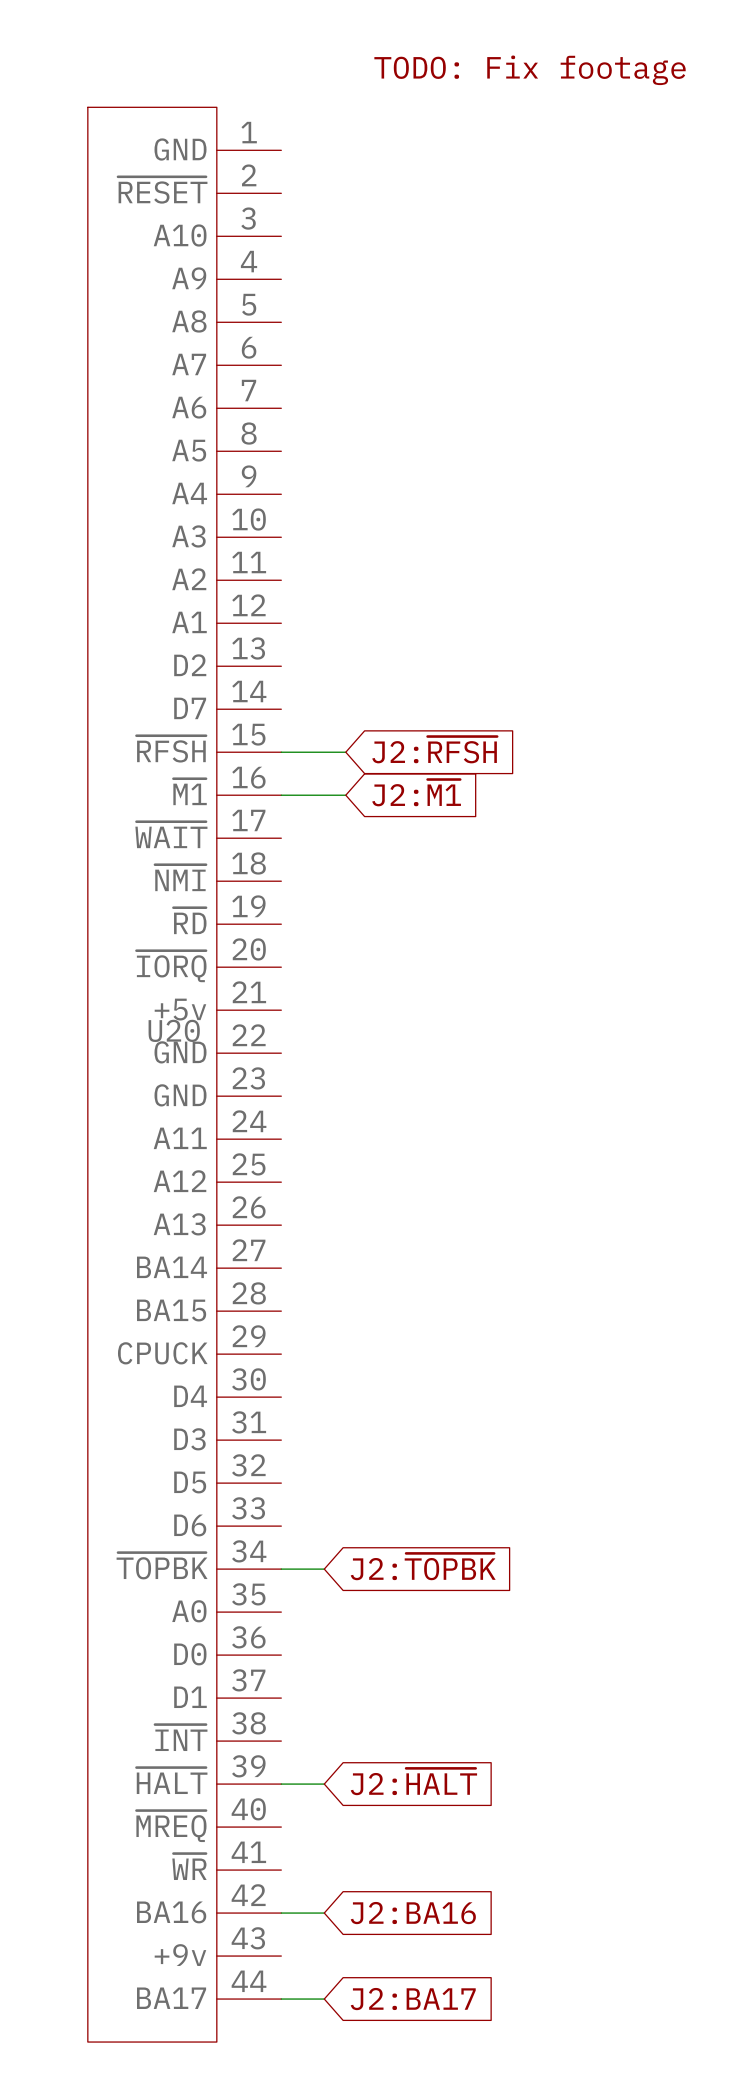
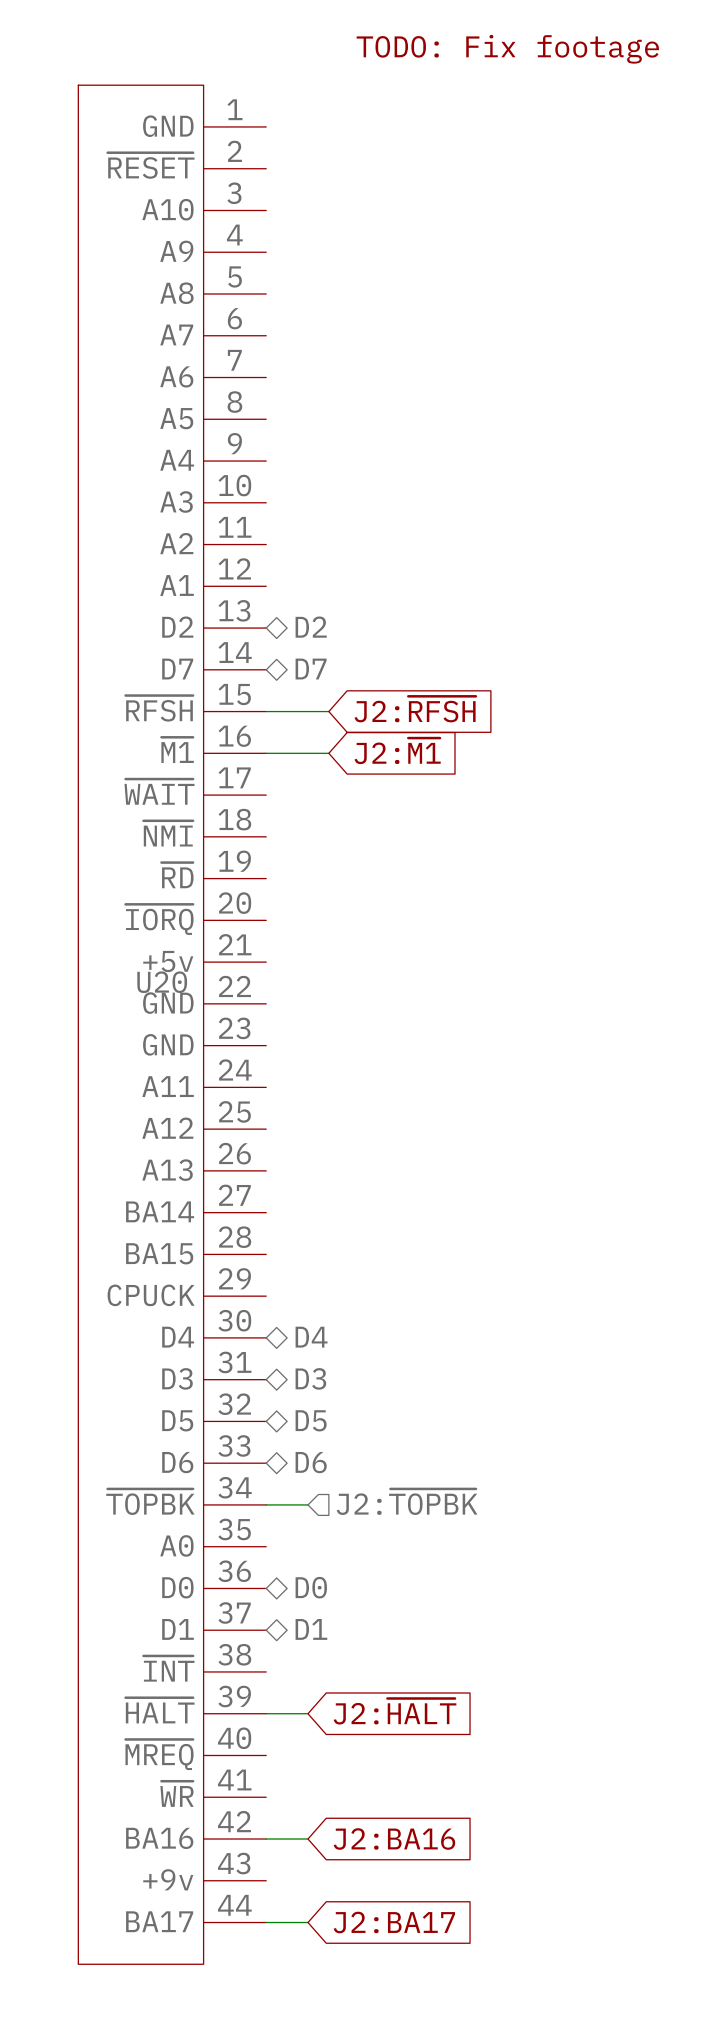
hierarchical label: none -> D2 (311, 627)
hierarchical label: none -> D7 (311, 669)
hierarchical label: none -> D4 (311, 1337)
hierarchical label: none -> D3 (310, 1378)
hierarchical label: none -> D5 (311, 1420)
hierarchical label: none -> D6 (311, 1462)
global label: J2:~{TOPBK} (423, 1566) -> none
hierarchical label: none -> J2:~{TOPBK} (407, 1501)
hierarchical label: none -> D0 (311, 1587)
hierarchical label: none -> D1 (311, 1629)

